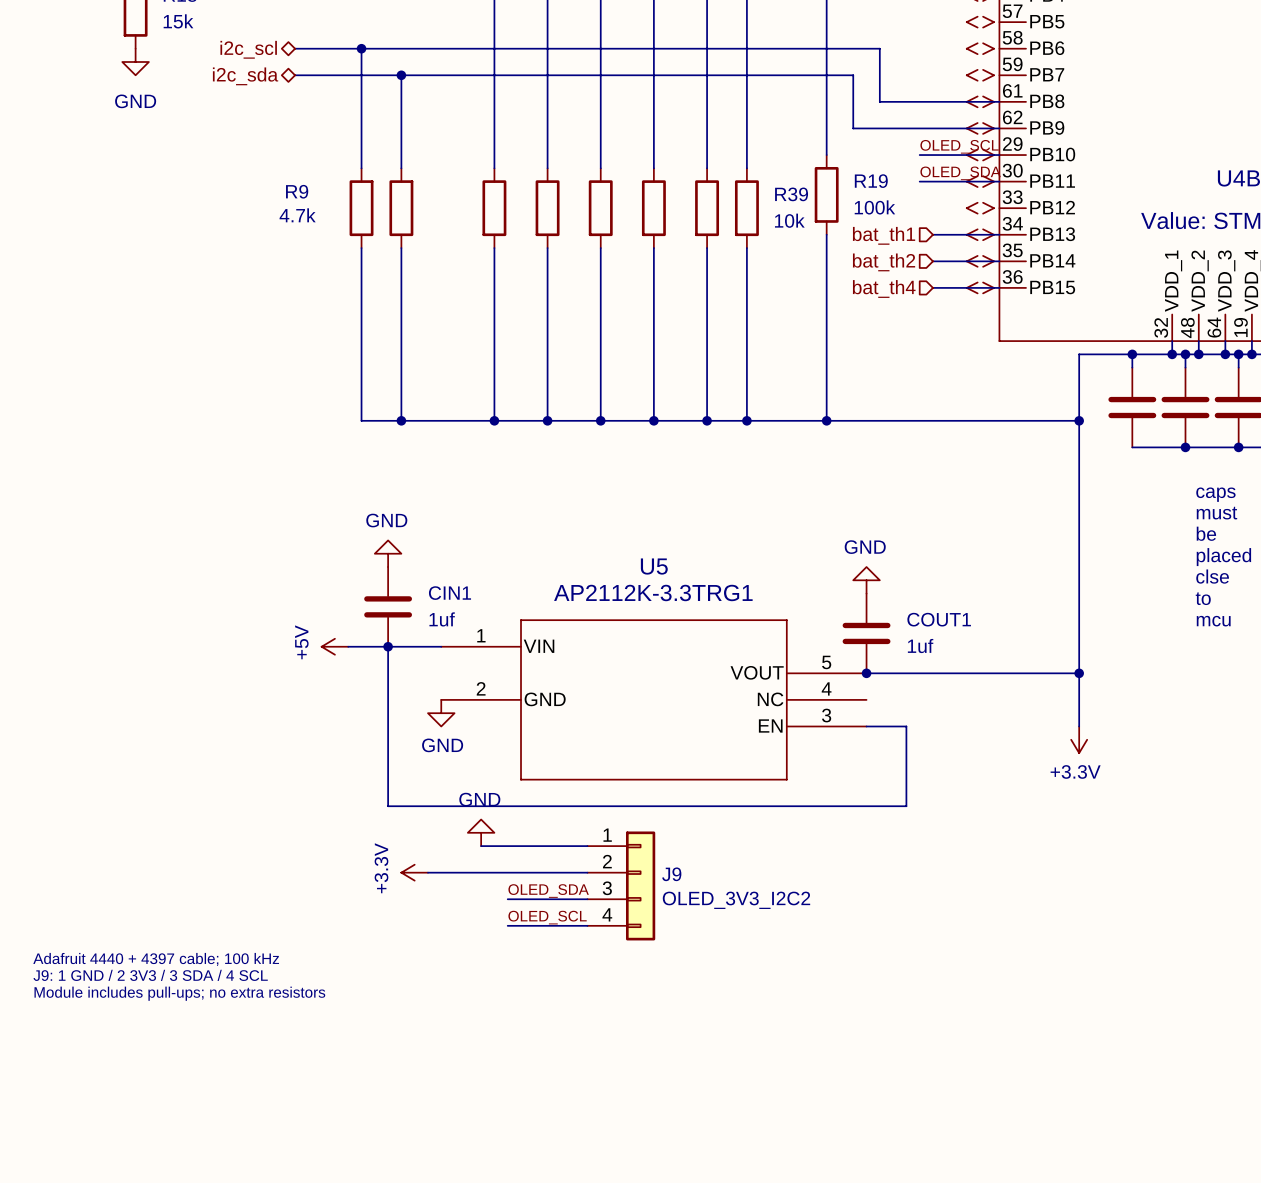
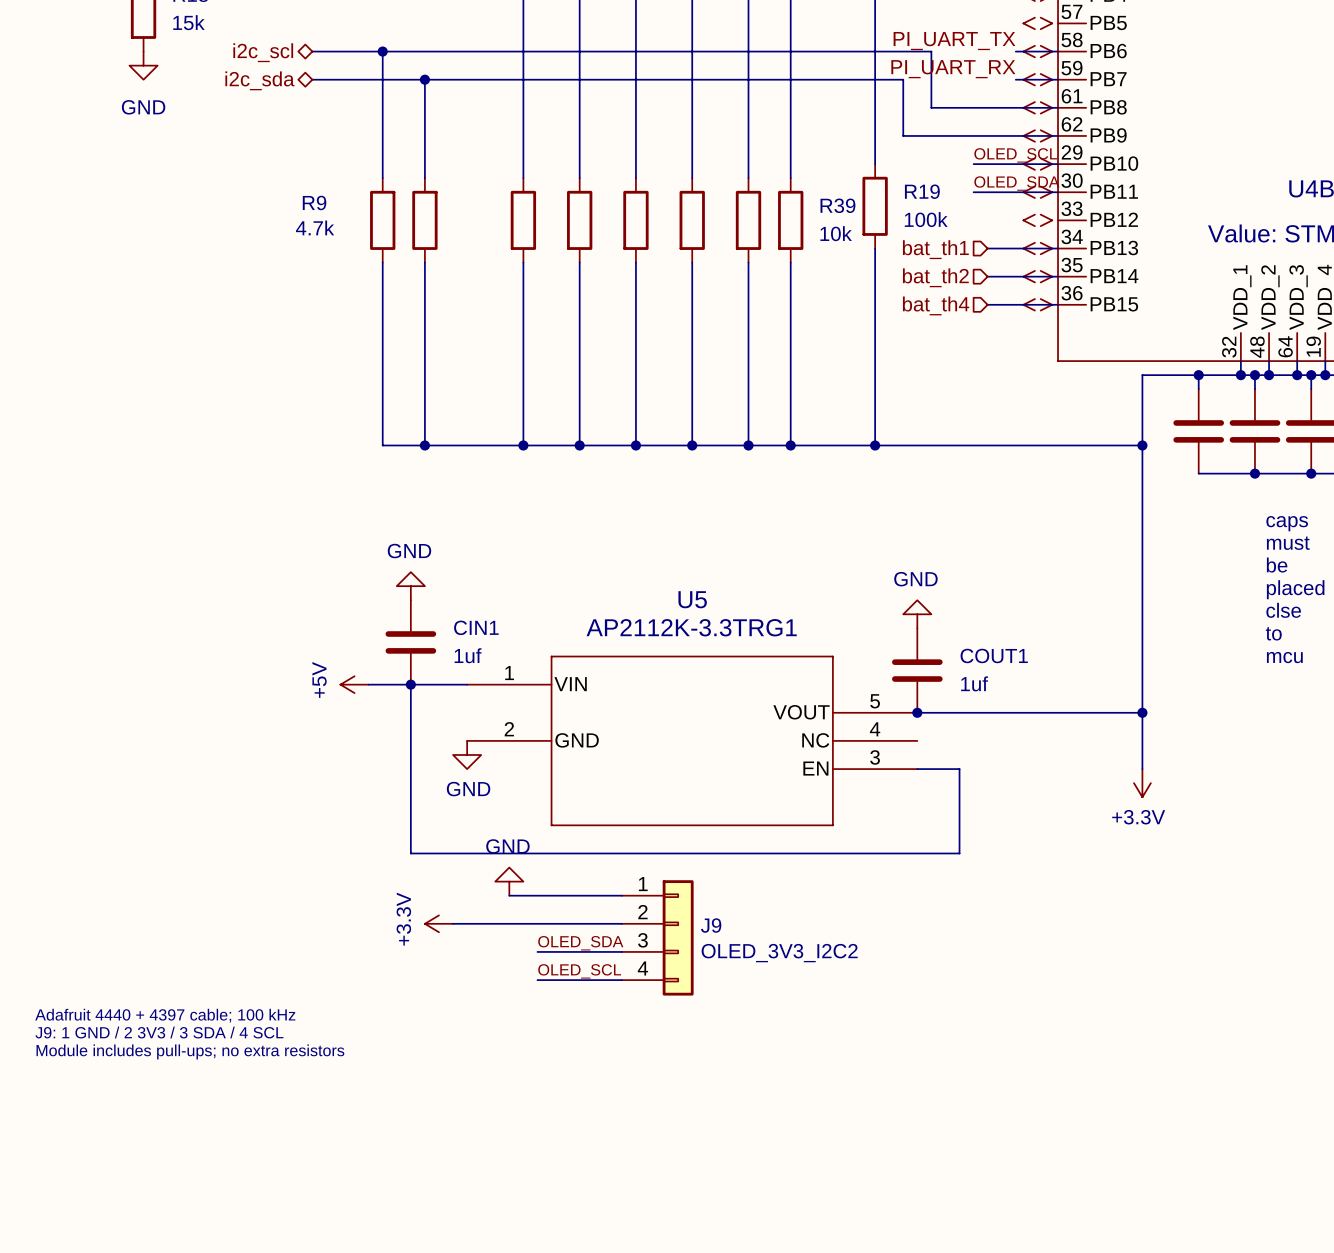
label: none -> PI_UART_TX (954, 41)
wire: none -> (1015, 51) (1058, 51)
label: none -> PI_UART_RX (953, 69)
wire: none -> (1015, 79) (1058, 79)

